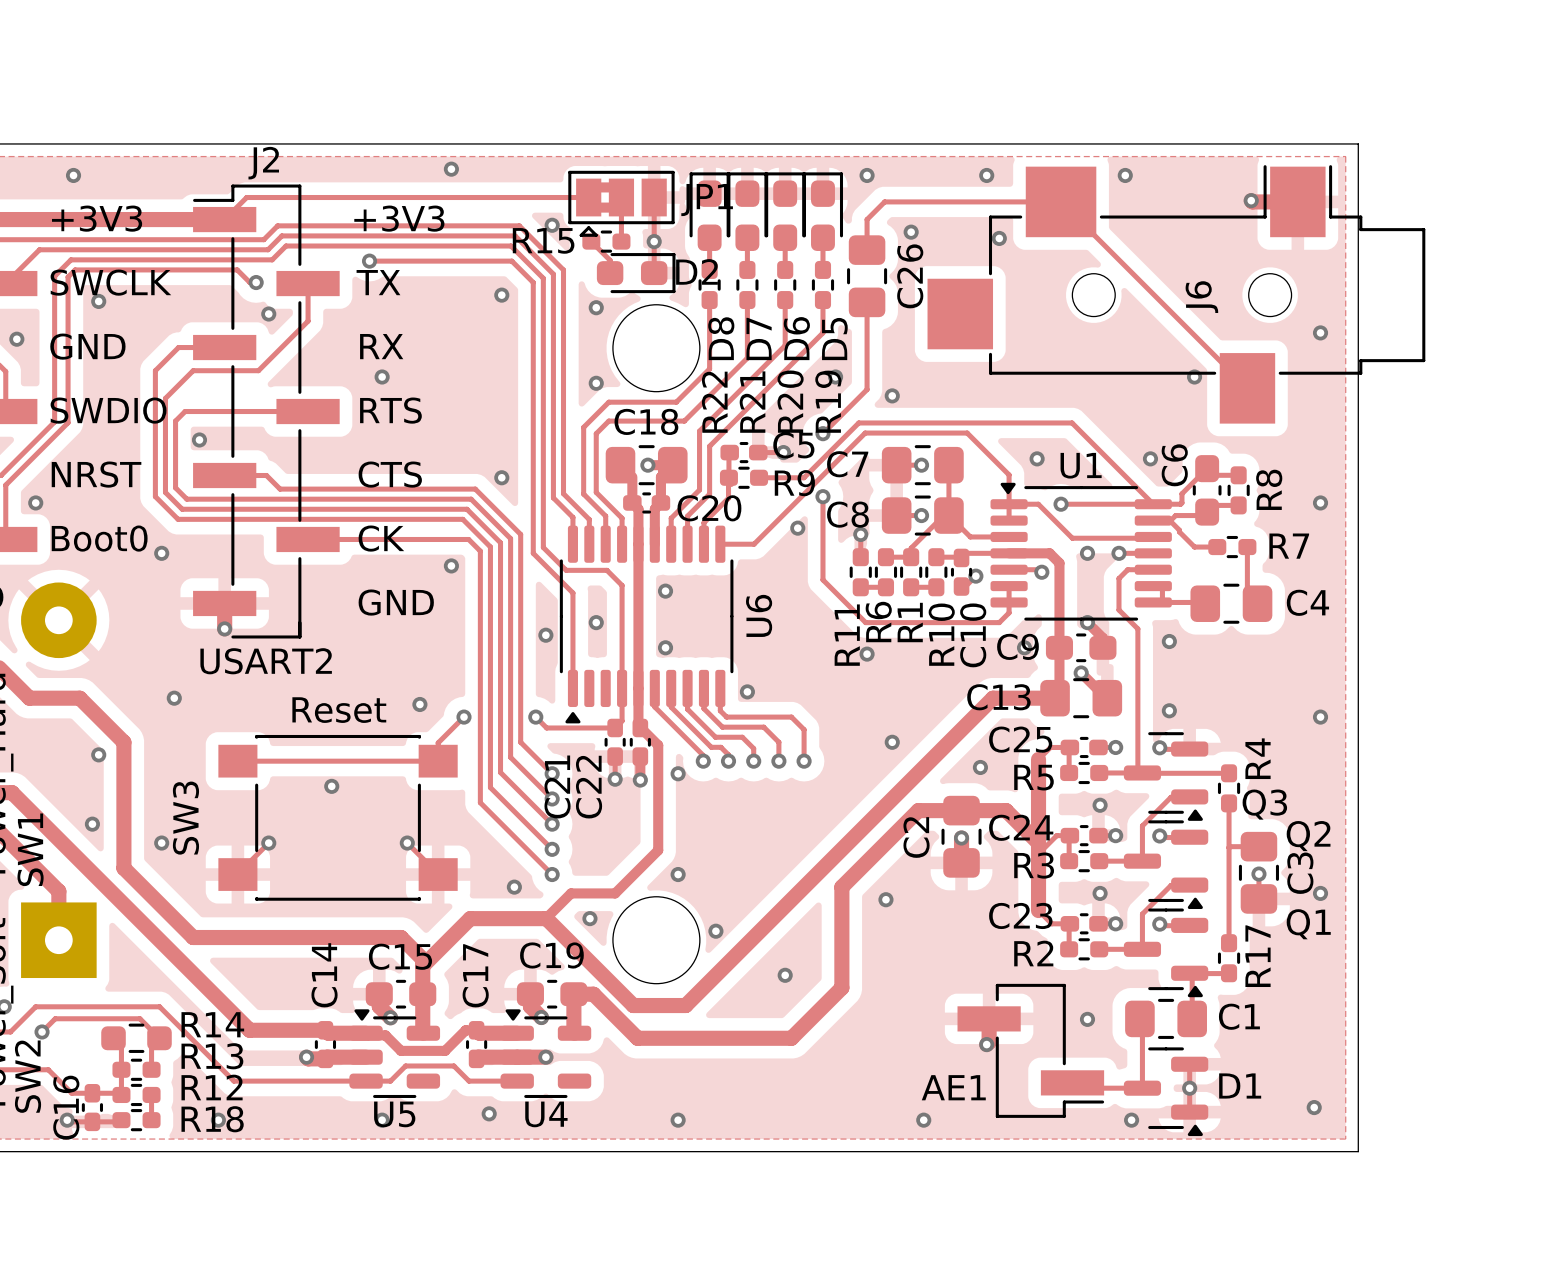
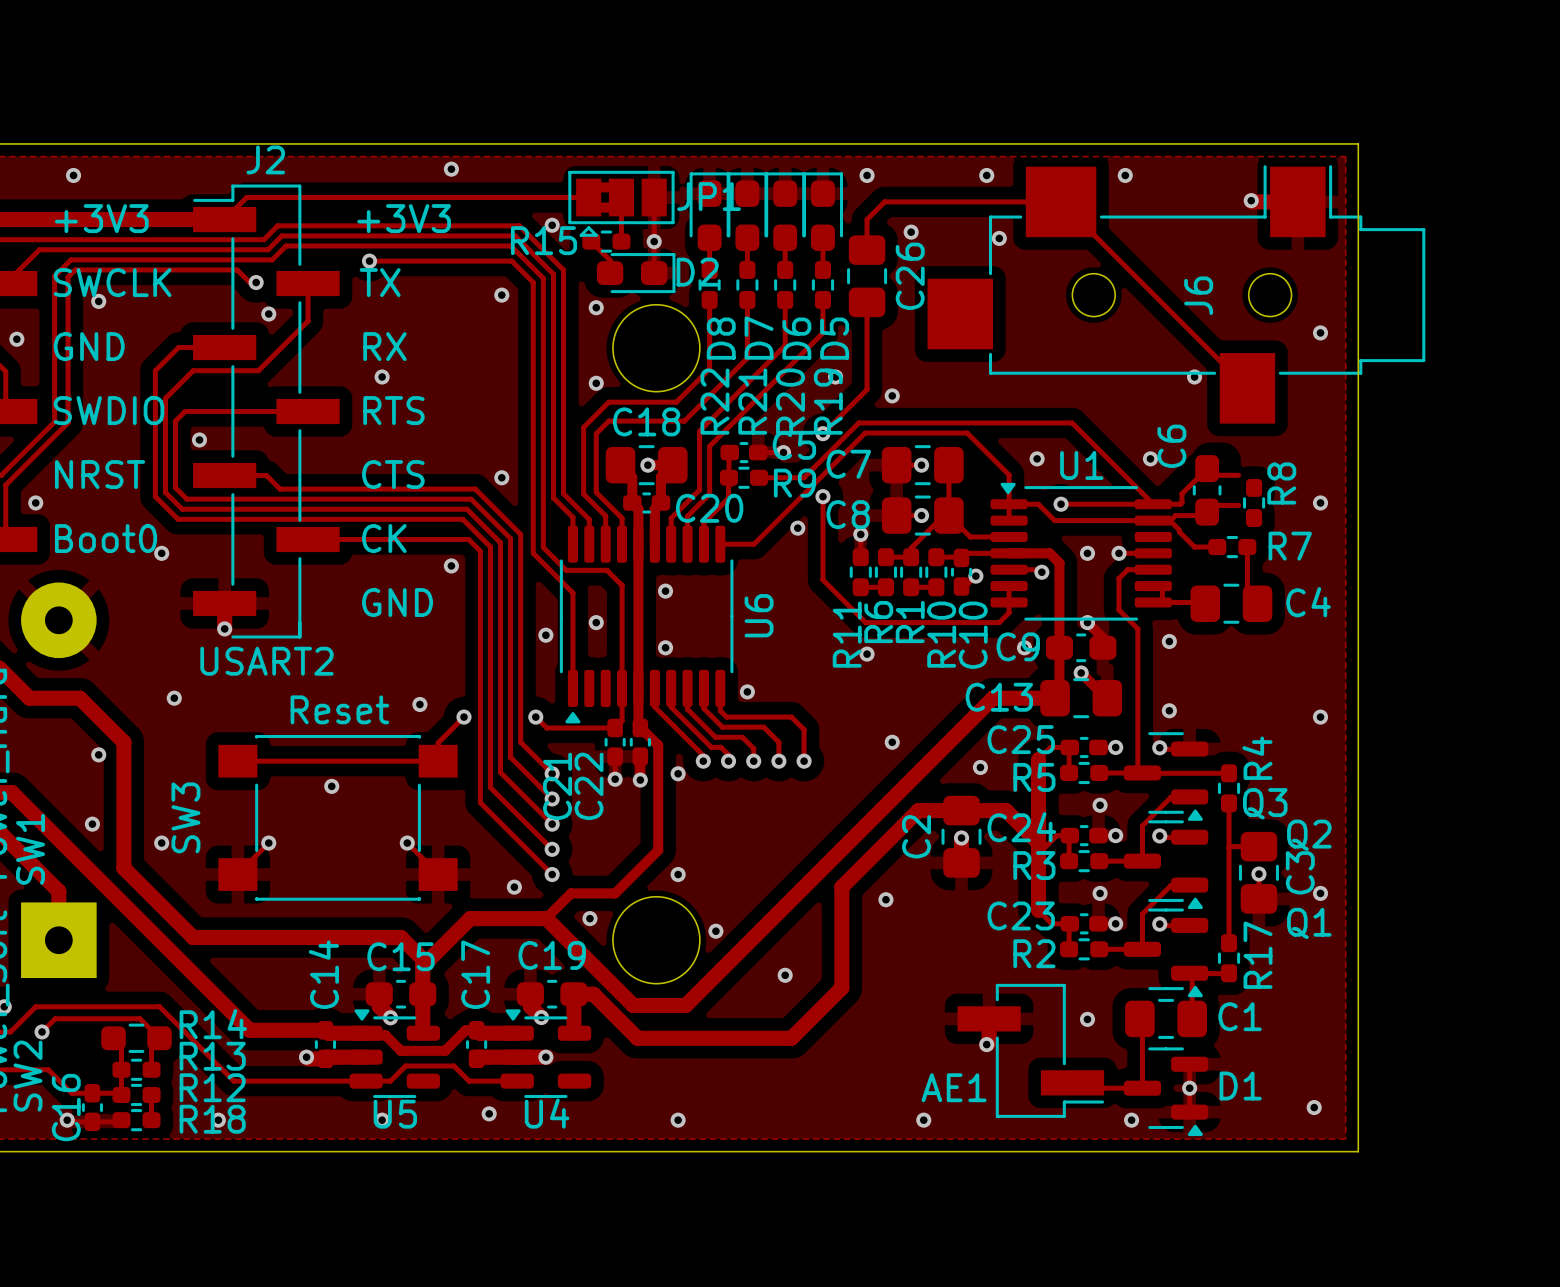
C6 name position: C6 (1174, 465) -> C6 (1171, 446)
R8 name position: R8 (1269, 489) -> R8 (1281, 483)
R8 position: (1238, 490) -> (1254, 502)
track: (1054, 520) (1072, 538) (1153, 536) -> (1054, 520) (1153, 520)

